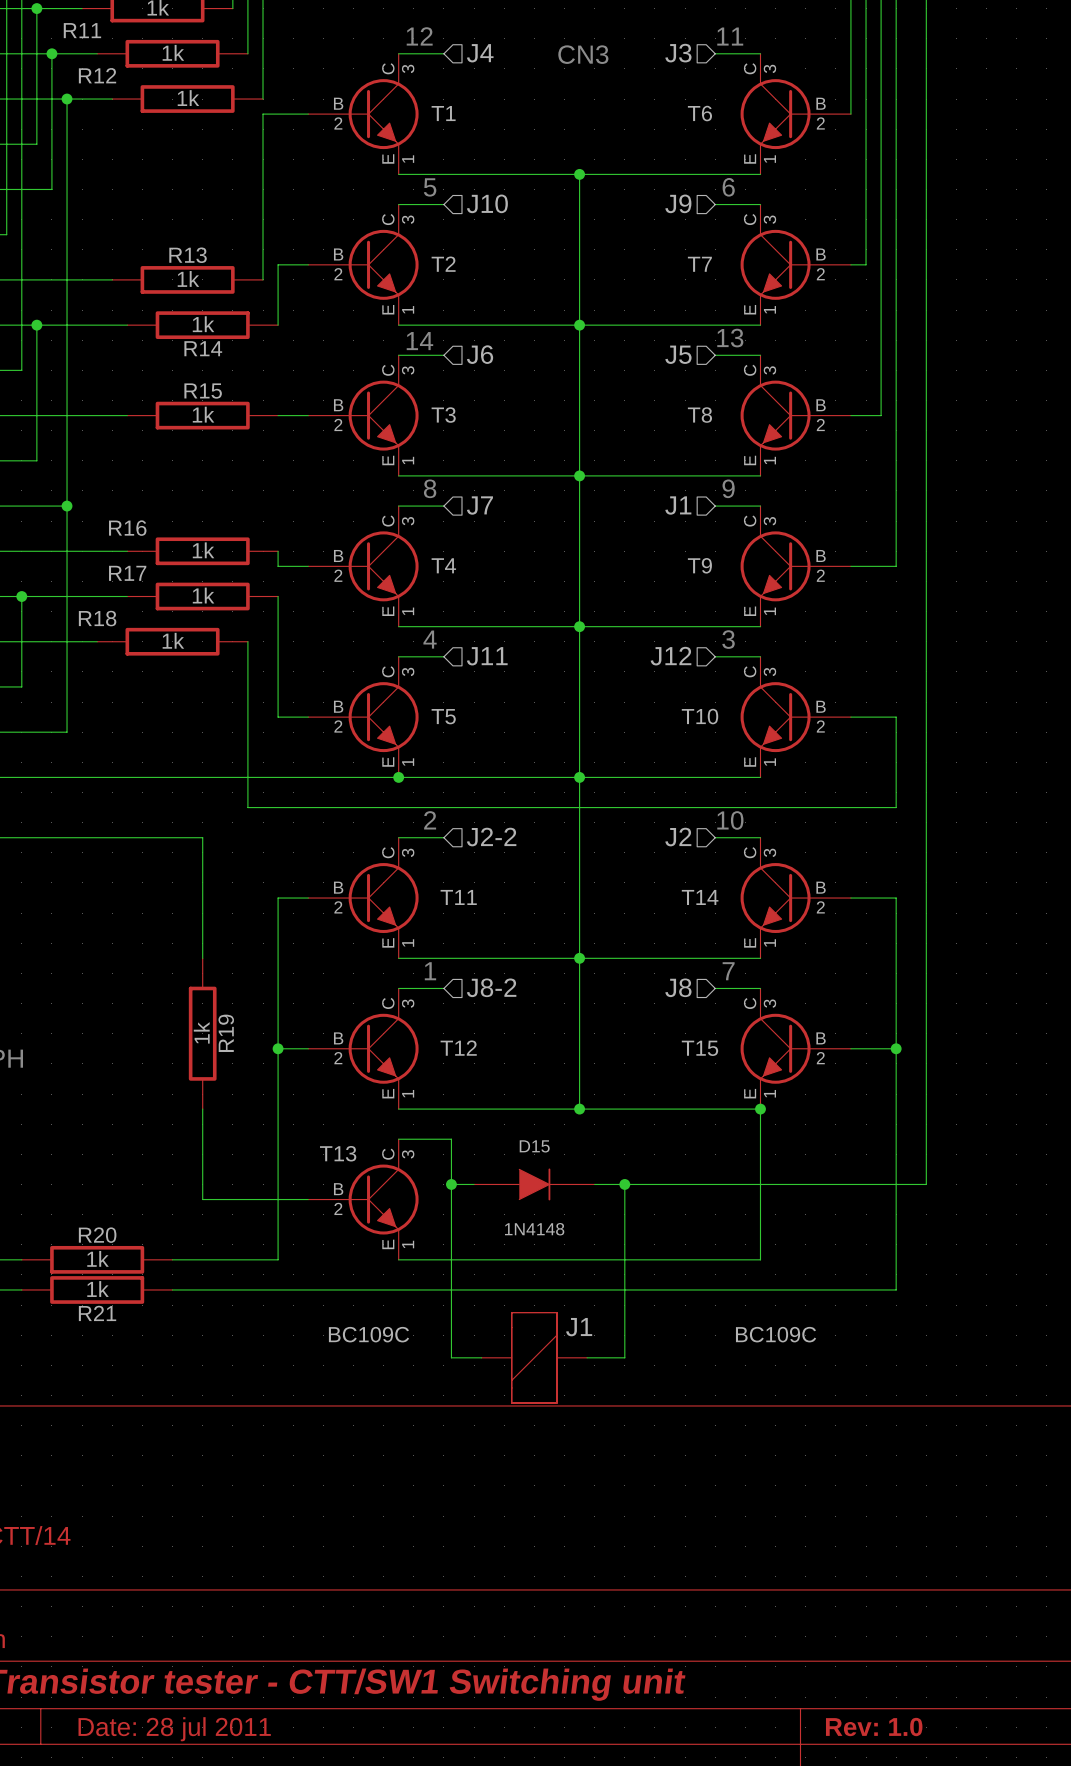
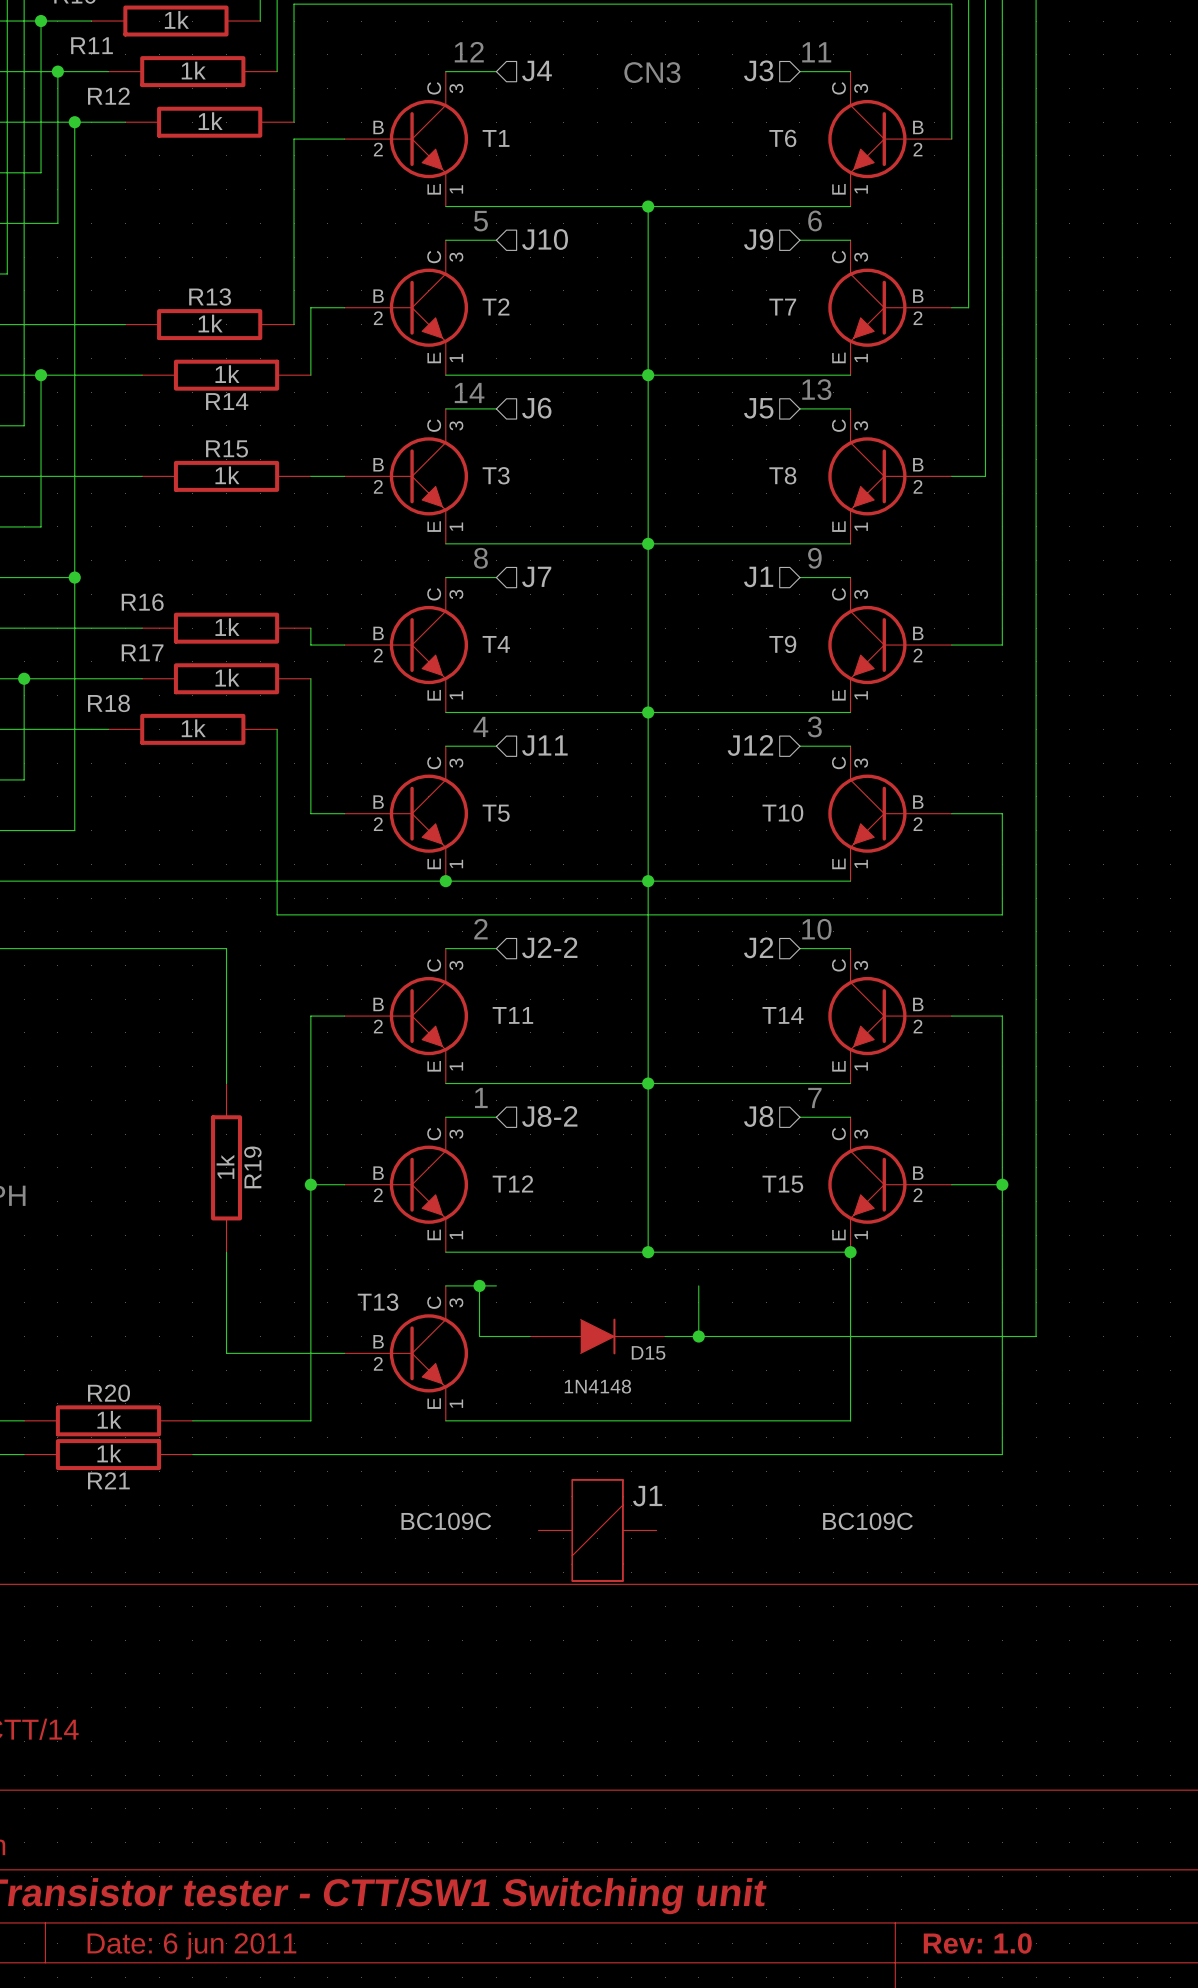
wire: none -> (479, 1285) (479, 1336) (504, 1336)
wire: (443, 1139) (451, 1139) (451, 1357) (481, 1357) -> none
D15 name position: D15 (534, 1146) -> D15 (648, 1352)
junction position: (451, 1184) -> (479, 1285)
wire: (624, 1184) (624, 1357) (587, 1357) -> (698, 1336) (698, 1285)
T13 value position: BC109C (369, 1334) -> BC109C (446, 1521)
T15 value position: BC109C (776, 1334) -> BC109C (867, 1521)
title block: Date: 28 jul 2011 (174, 1729) -> Date: 6 jun 2011 (191, 1945)

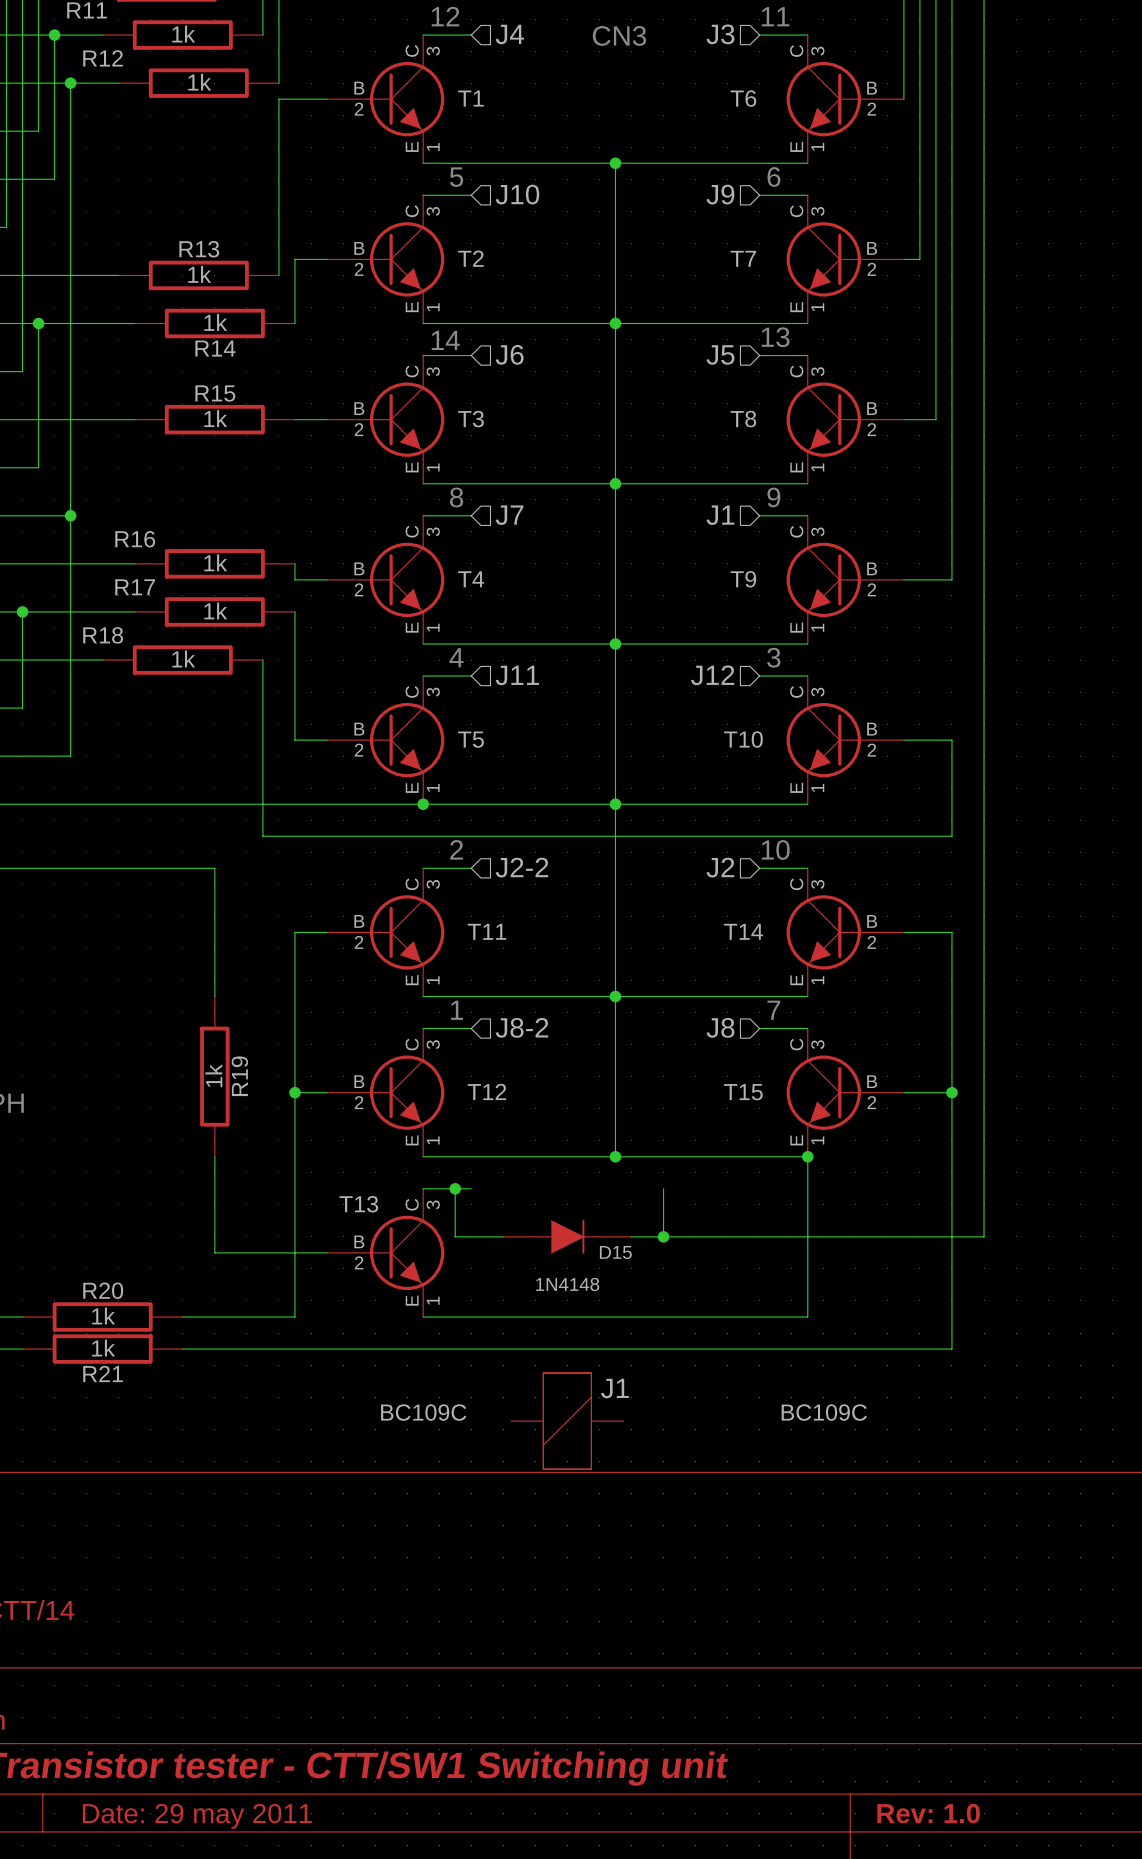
title block: Date: 6 jun 2011 (191, 1945) -> Date: 29 may 2011 (197, 1816)

